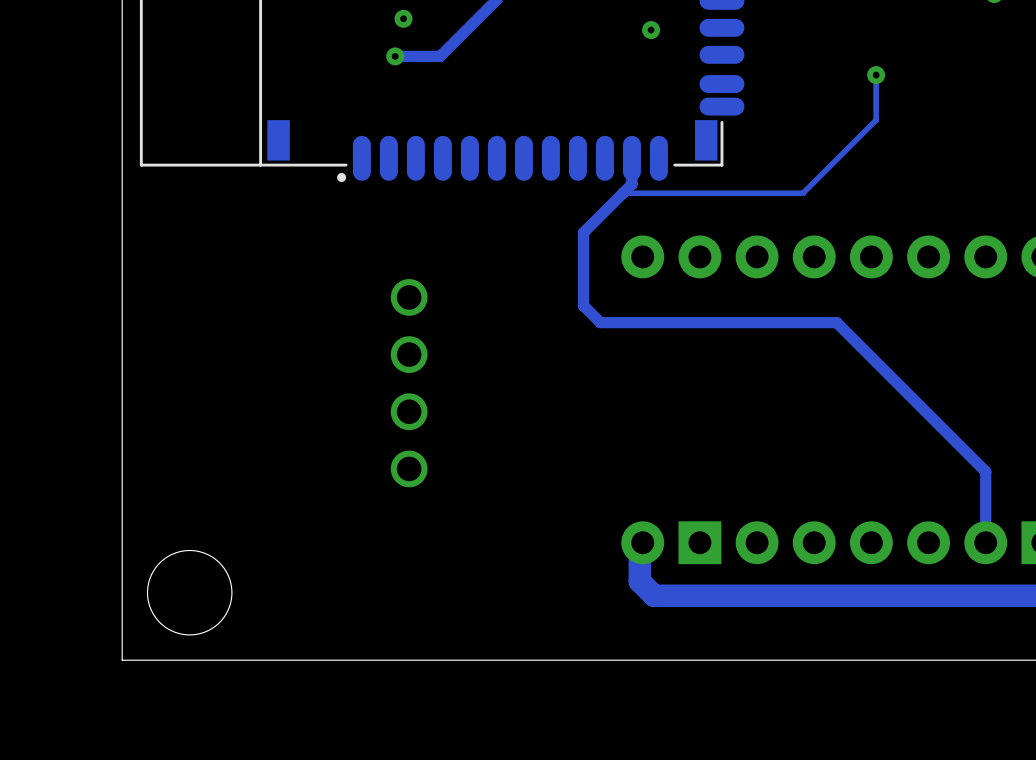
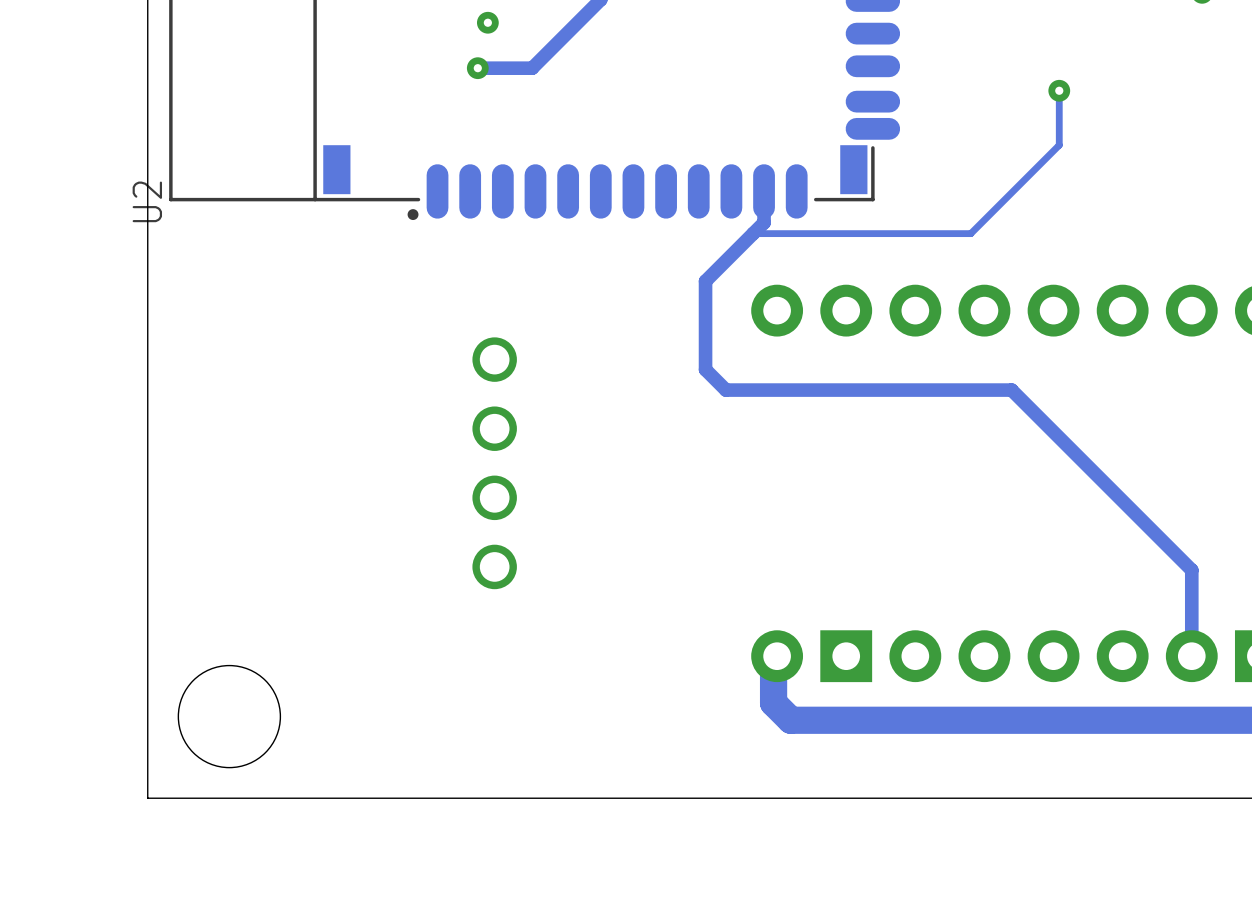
via: (651, 30) -> none
U2 name: none -> U2 (147, 201)

